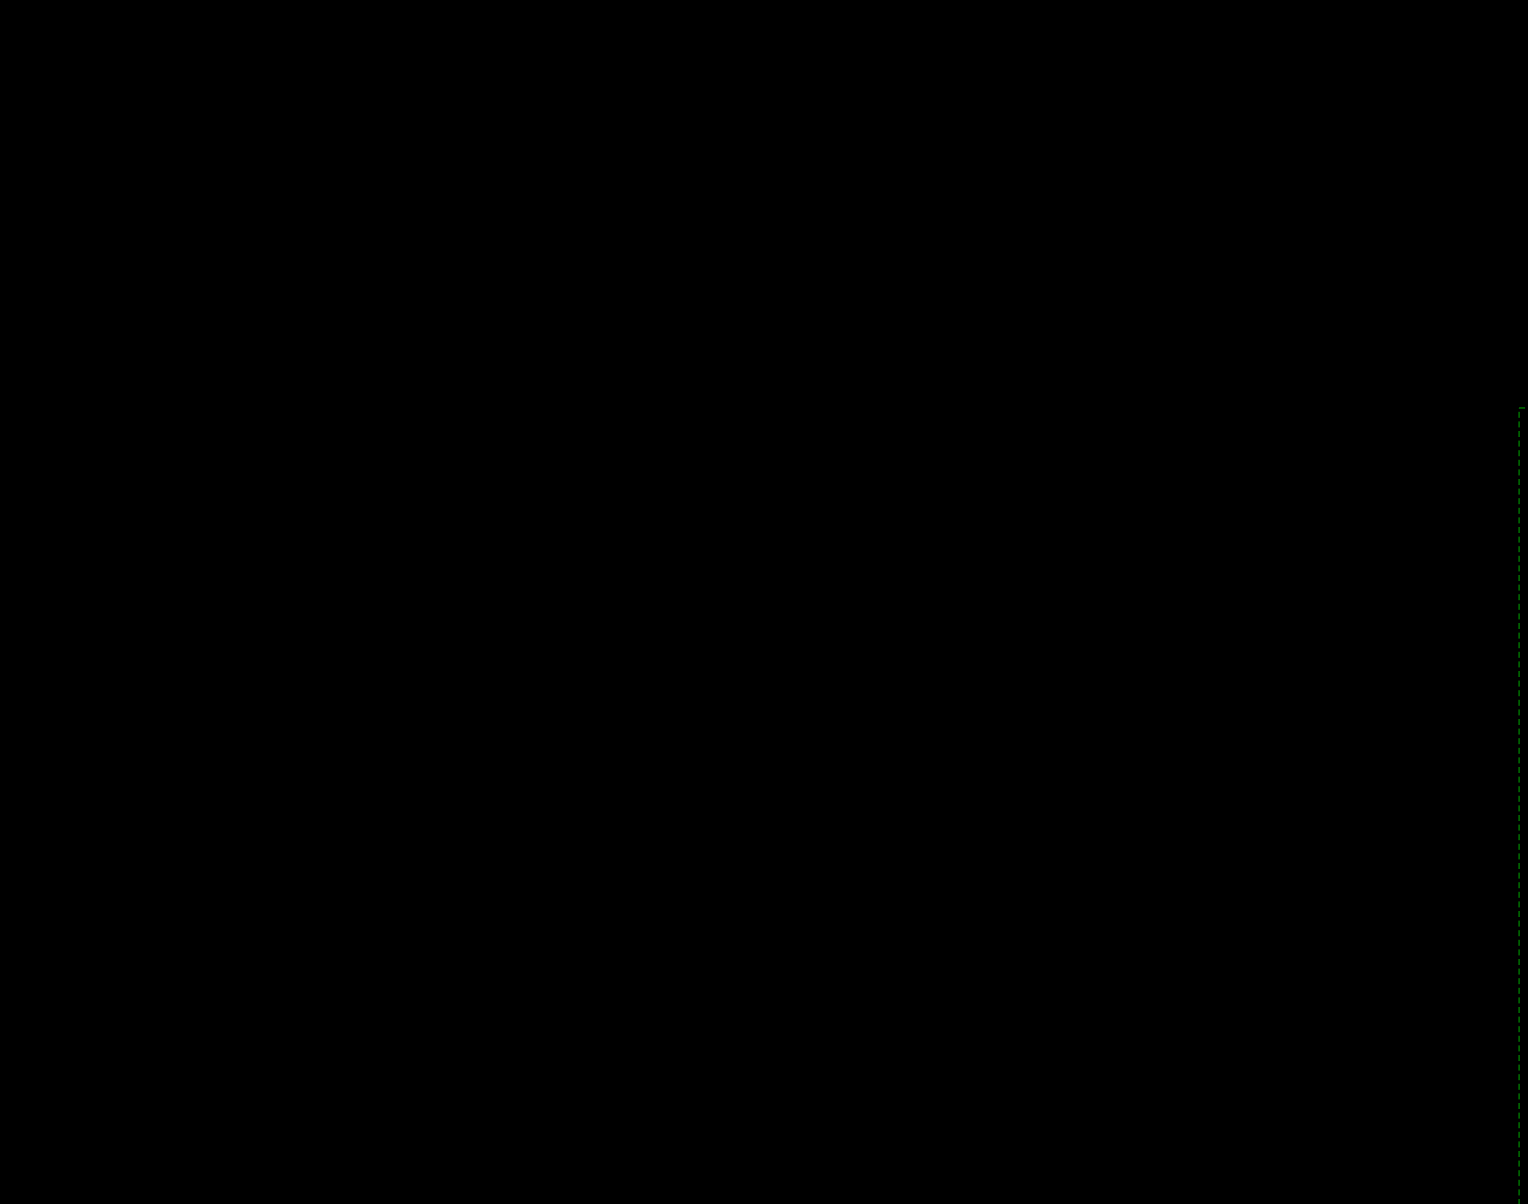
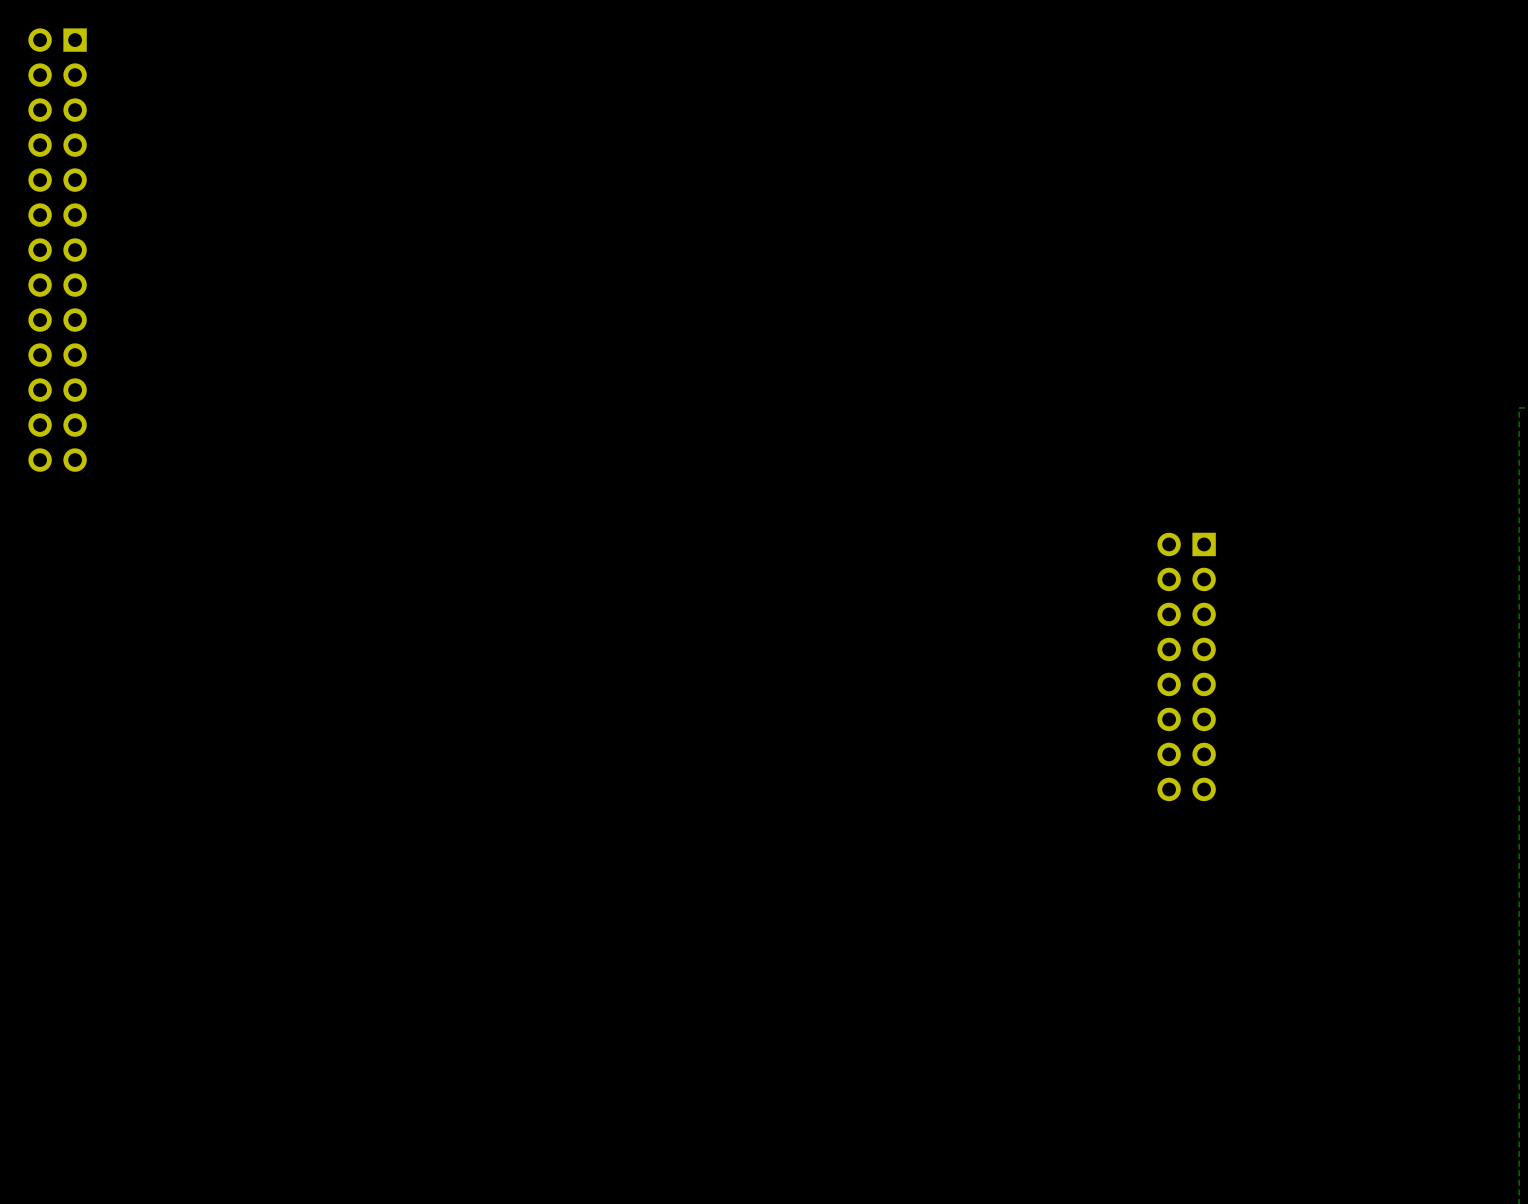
part: none -> (57, 250)
part: none -> (1186, 666)

